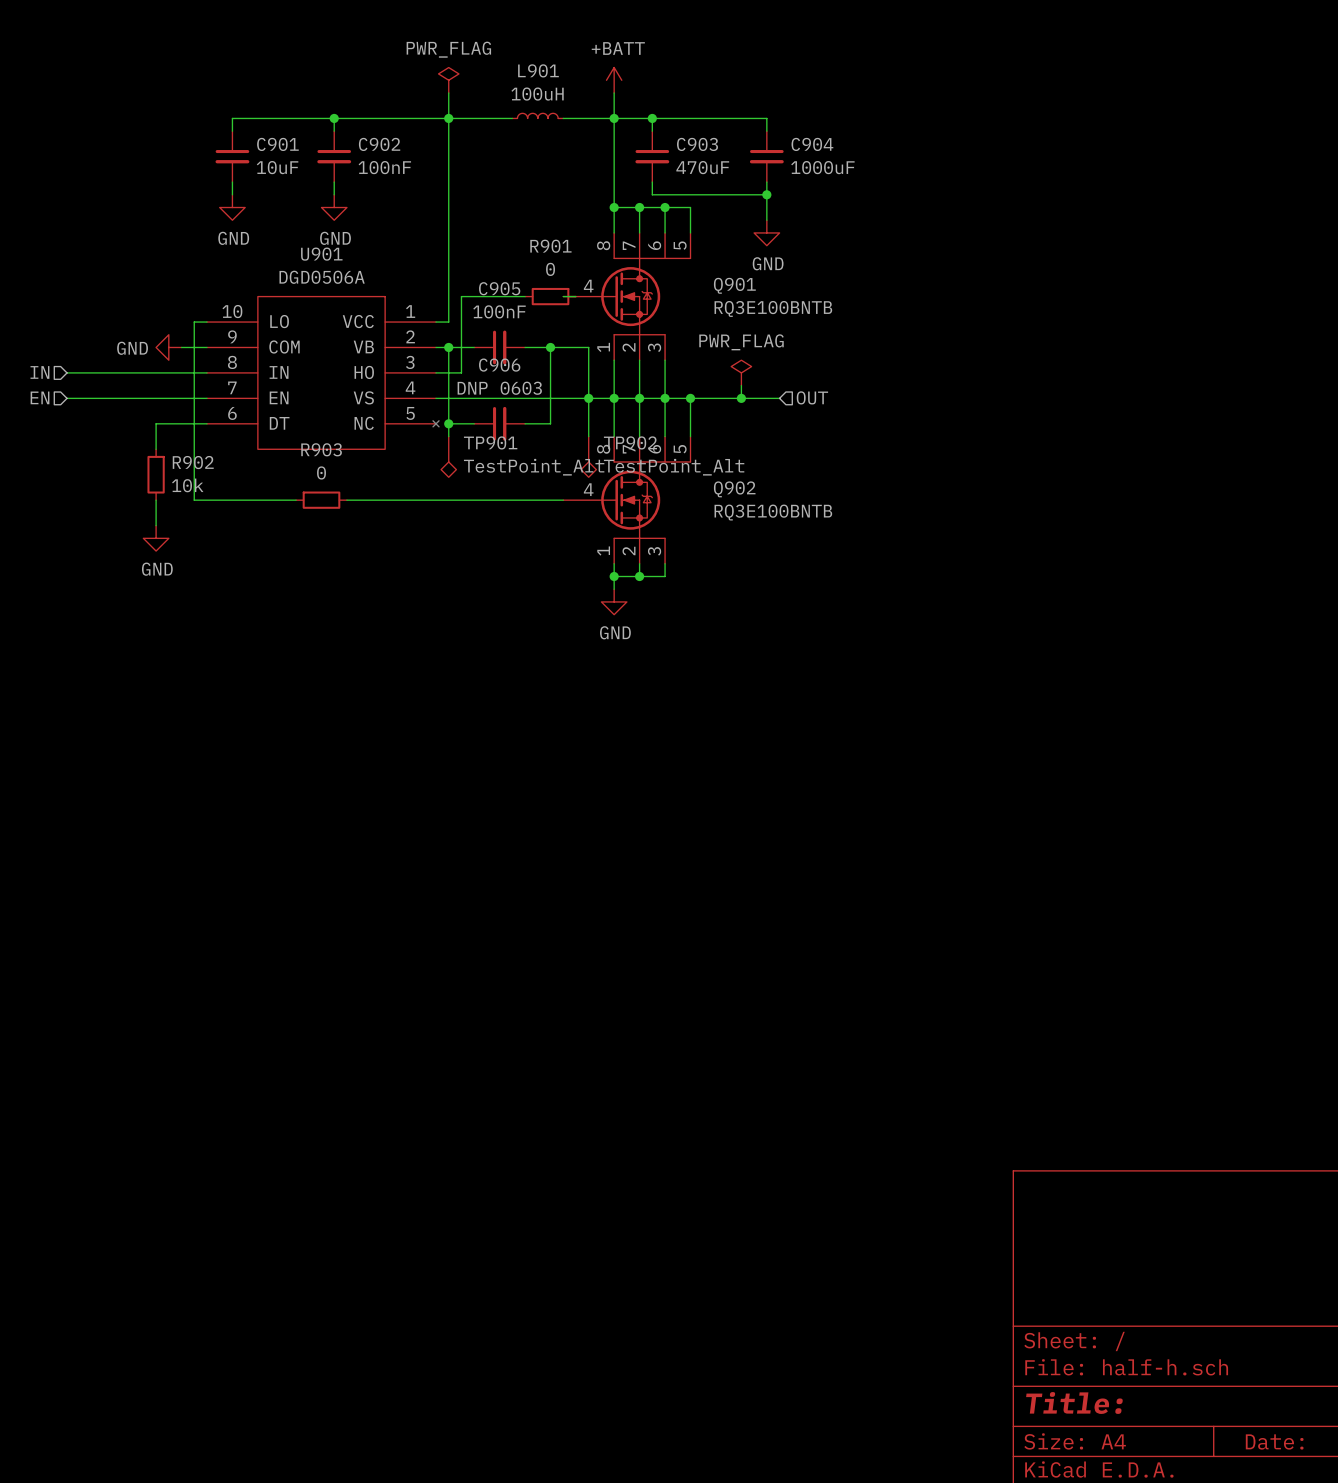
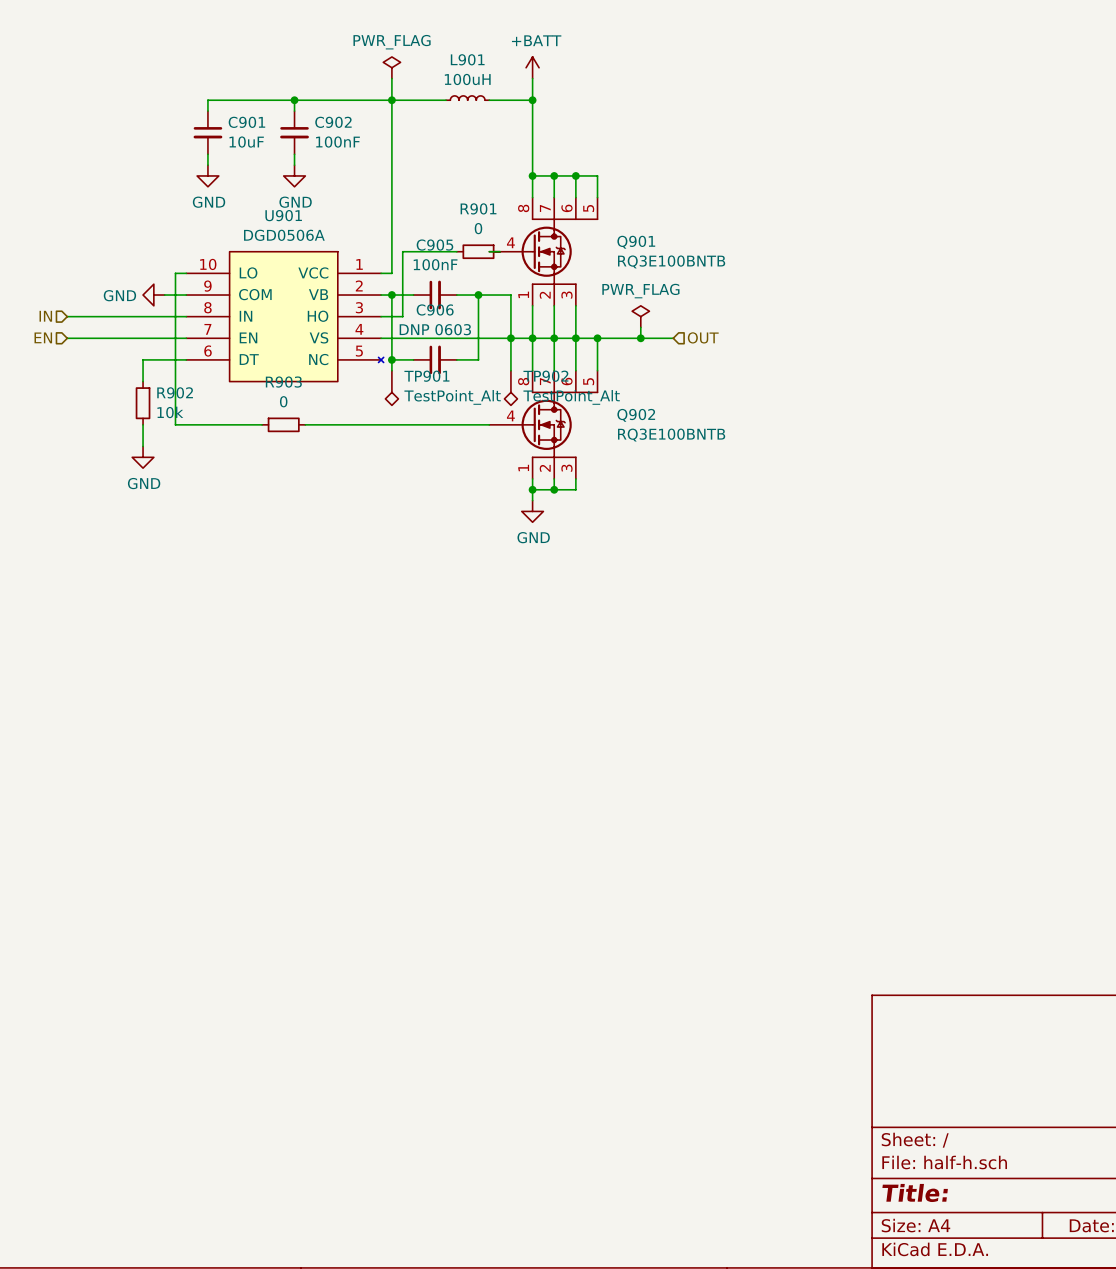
wire: (614, 118) (766, 118) (766, 131) -> none
wire: (652, 118) (652, 131) -> none
junction: (652, 118) -> none
C903: 470uF (652, 156) -> none
C904: 1000uF (766, 156) -> none
wire: (652, 182) (652, 194) (766, 194) -> none
wire: (766, 182) (766, 220) -> none
junction: (766, 194) -> none
power symbol: GND (766, 232) -> none

